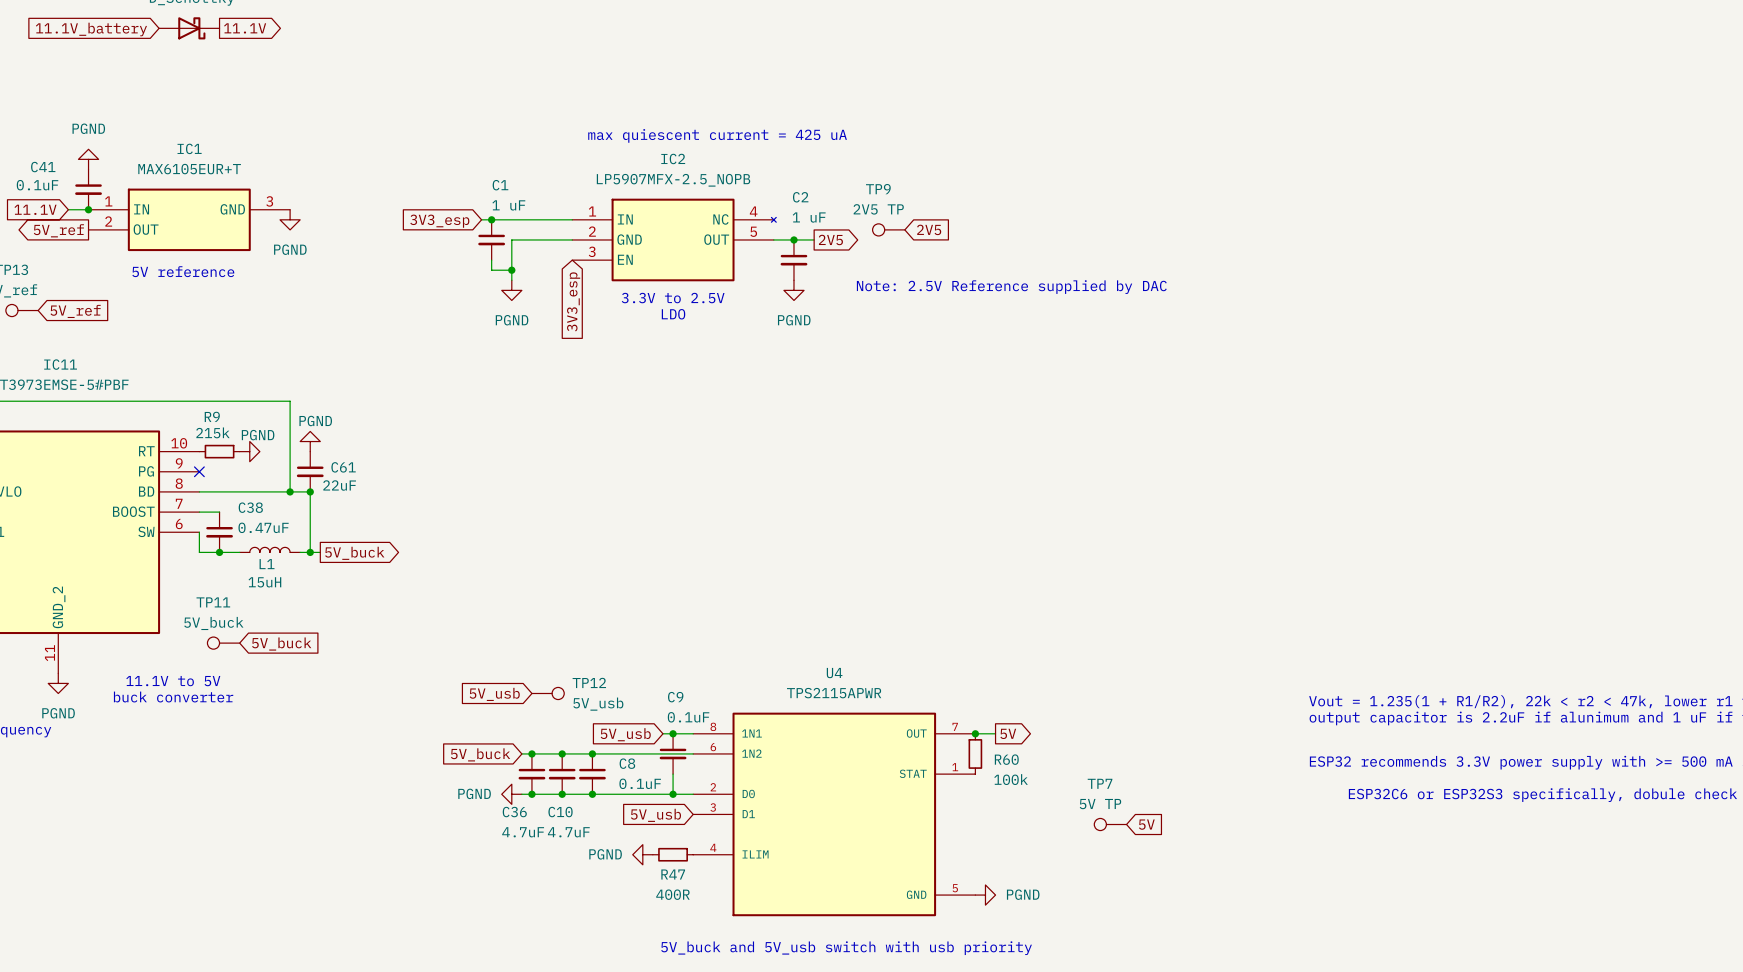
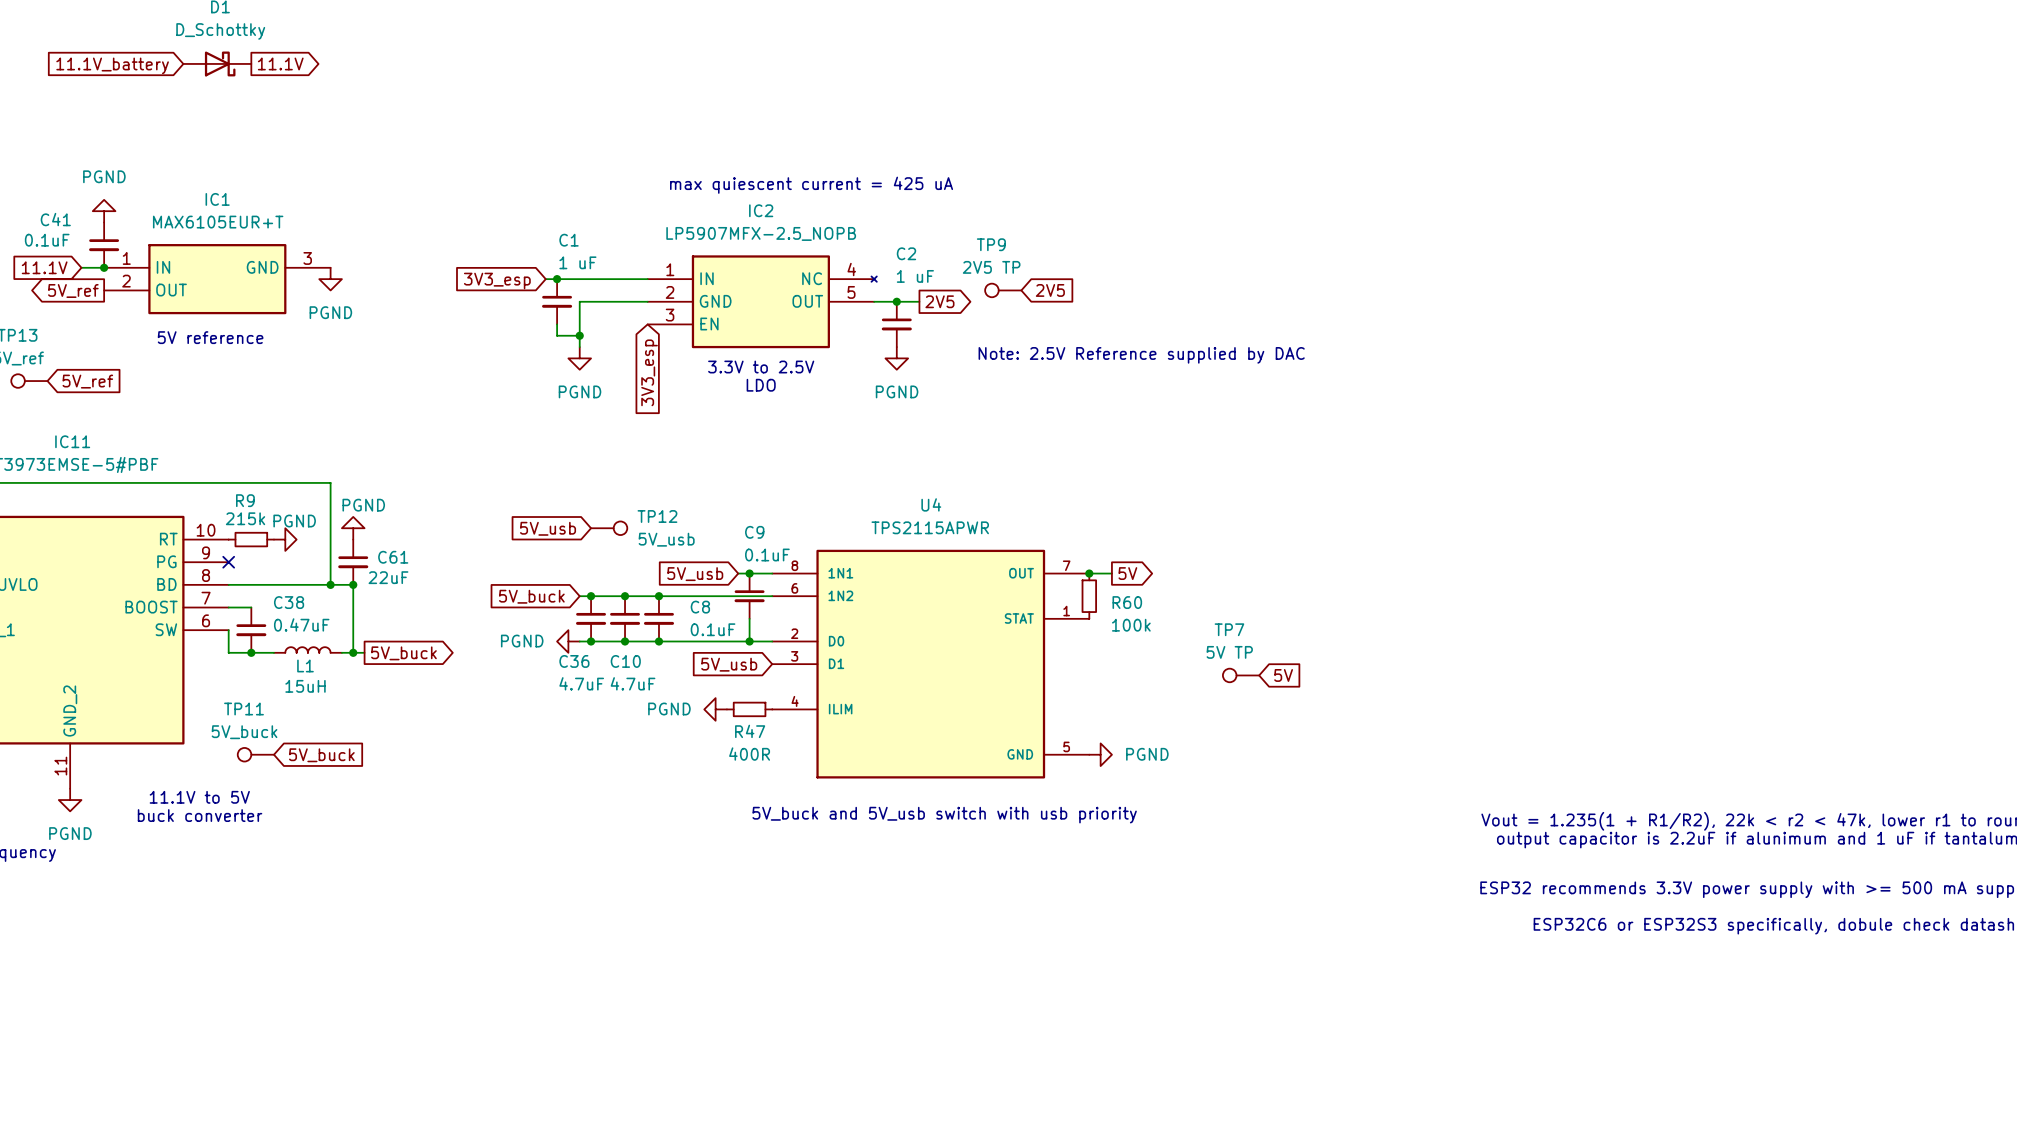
global label: none -> 5V_usb (548, 528)
wire: none -> (738, 573) (772, 573)
junction: none -> (749, 573)
wire: none -> (1089, 573) (1111, 573)
junction: none -> (1089, 573)
global label: none -> 5V (1127, 573)
global label: none -> 5V_usb (695, 574)
global label: none -> 5V_buck (531, 596)
wire: none -> (579, 596) (772, 596)
junction: none -> (591, 596)
junction: none -> (625, 596)
junction: none -> (658, 596)
wire: none -> (749, 618) (749, 641)
power symbol: none -> PGND (568, 641)
wire: none -> (579, 641) (772, 641)
junction: none -> (591, 641)
junction: none -> (625, 641)
junction: none -> (658, 641)
junction: none -> (749, 641)
global label: none -> 5V_usb (729, 664)
global label: none -> 5V (1283, 675)
power symbol: none -> PGND (715, 709)
power symbol: none -> PGND (1100, 754)
TP12 position: (548, 693) -> (609, 528)
global label: 5V_usb (494, 694) -> none
text: none -> 5V_buck and 5V_usb switch with usb priority (944, 815)
wire: (662, 733) (693, 733) -> none
junction: (673, 733) -> none
wire: (975, 733) (995, 733) -> none
junction: (975, 733) -> none
global label: 5V (1008, 733) -> none
global label: 5V_usb (625, 734) -> none
wire: (521, 753) (693, 753) -> none
junction: (531, 753) -> none
junction: (562, 753) -> none
junction: (592, 753) -> none
C9 position: (673, 753) -> (749, 596)
R60 position: (975, 753) -> (1089, 596)
global label: 5V_buck (480, 754) -> none
C36 position: (531, 774) -> (591, 618)
C10 position: (562, 774) -> (625, 618)
C8 position: (592, 774) -> (658, 618)
wire: (673, 774) (673, 794) -> none
power symbol: PGND (511, 794) -> none
wire: (521, 794) (693, 794) -> none
junction: (531, 794) -> none
junction: (562, 794) -> none
junction: (592, 794) -> none
junction: (673, 794) -> none
U4 position: (834, 814) -> (930, 664)
global label: 5V_usb (655, 815) -> none
TP7 position: (1110, 824) -> (1241, 675)
global label: 5V (1146, 824) -> none
power symbol: PGND (642, 854) -> none
R47 position: (673, 854) -> (749, 709)
power symbol: PGND (985, 895) -> none
text: 5V_buck and 5V_usb switch with usb priority (846, 948) -> none

